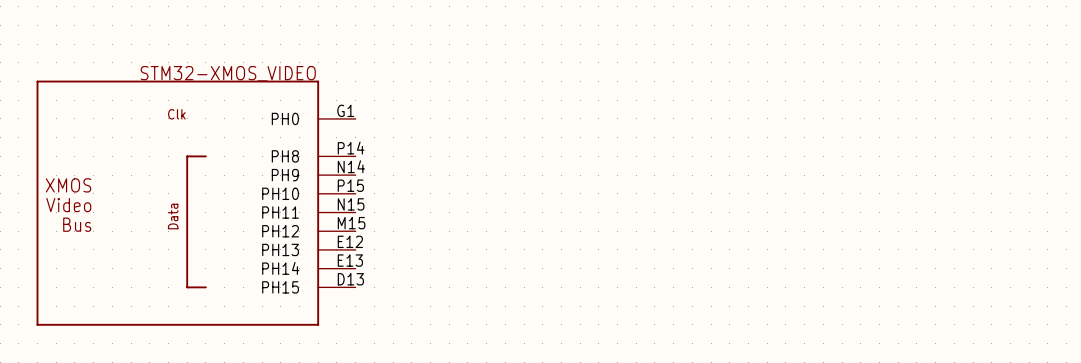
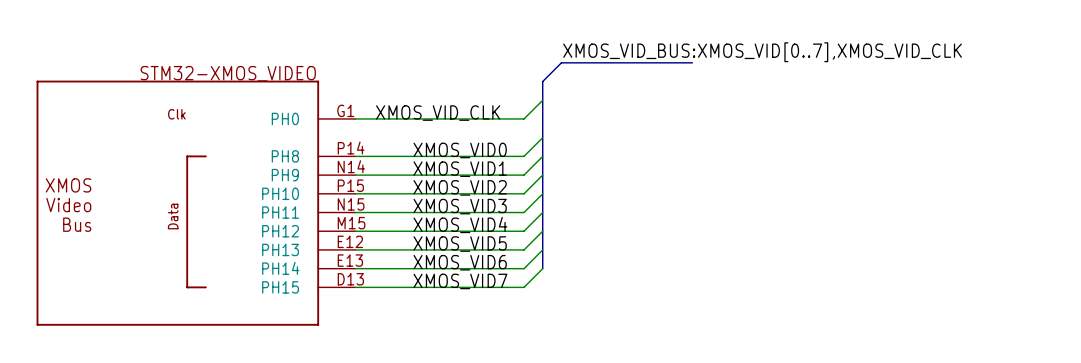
label: none -> XMOS_VID_BUS:XMOS_VID[0..7],XMOS_VID_CLK (762, 52)
bus: none -> (692, 62) (561, 62) (542, 81) (542, 268)
wire: none -> (542, 100) (524, 118) (355, 118)
label: none -> XMOS_VID_CLK (438, 113)
wire: none -> (542, 137) (524, 156) (355, 156)
label: none -> XMOS_VID0 (460, 150)
wire: none -> (542, 156) (524, 175) (355, 175)
label: none -> XMOS_VID1 (460, 169)
wire: none -> (542, 175) (524, 193) (355, 193)
label: none -> XMOS_VID2 (460, 187)
wire: none -> (542, 193) (524, 212) (355, 212)
label: none -> XMOS_VID3 (460, 206)
wire: none -> (542, 212) (524, 231) (355, 231)
label: none -> XMOS_VID4 (460, 225)
wire: none -> (542, 231) (524, 249) (355, 249)
label: none -> XMOS_VID5 (460, 244)
wire: none -> (542, 249) (524, 268) (355, 268)
label: none -> XMOS_VID6 (460, 262)
wire: none -> (542, 268) (524, 287) (355, 287)
label: none -> XMOS_VID7 (460, 281)

